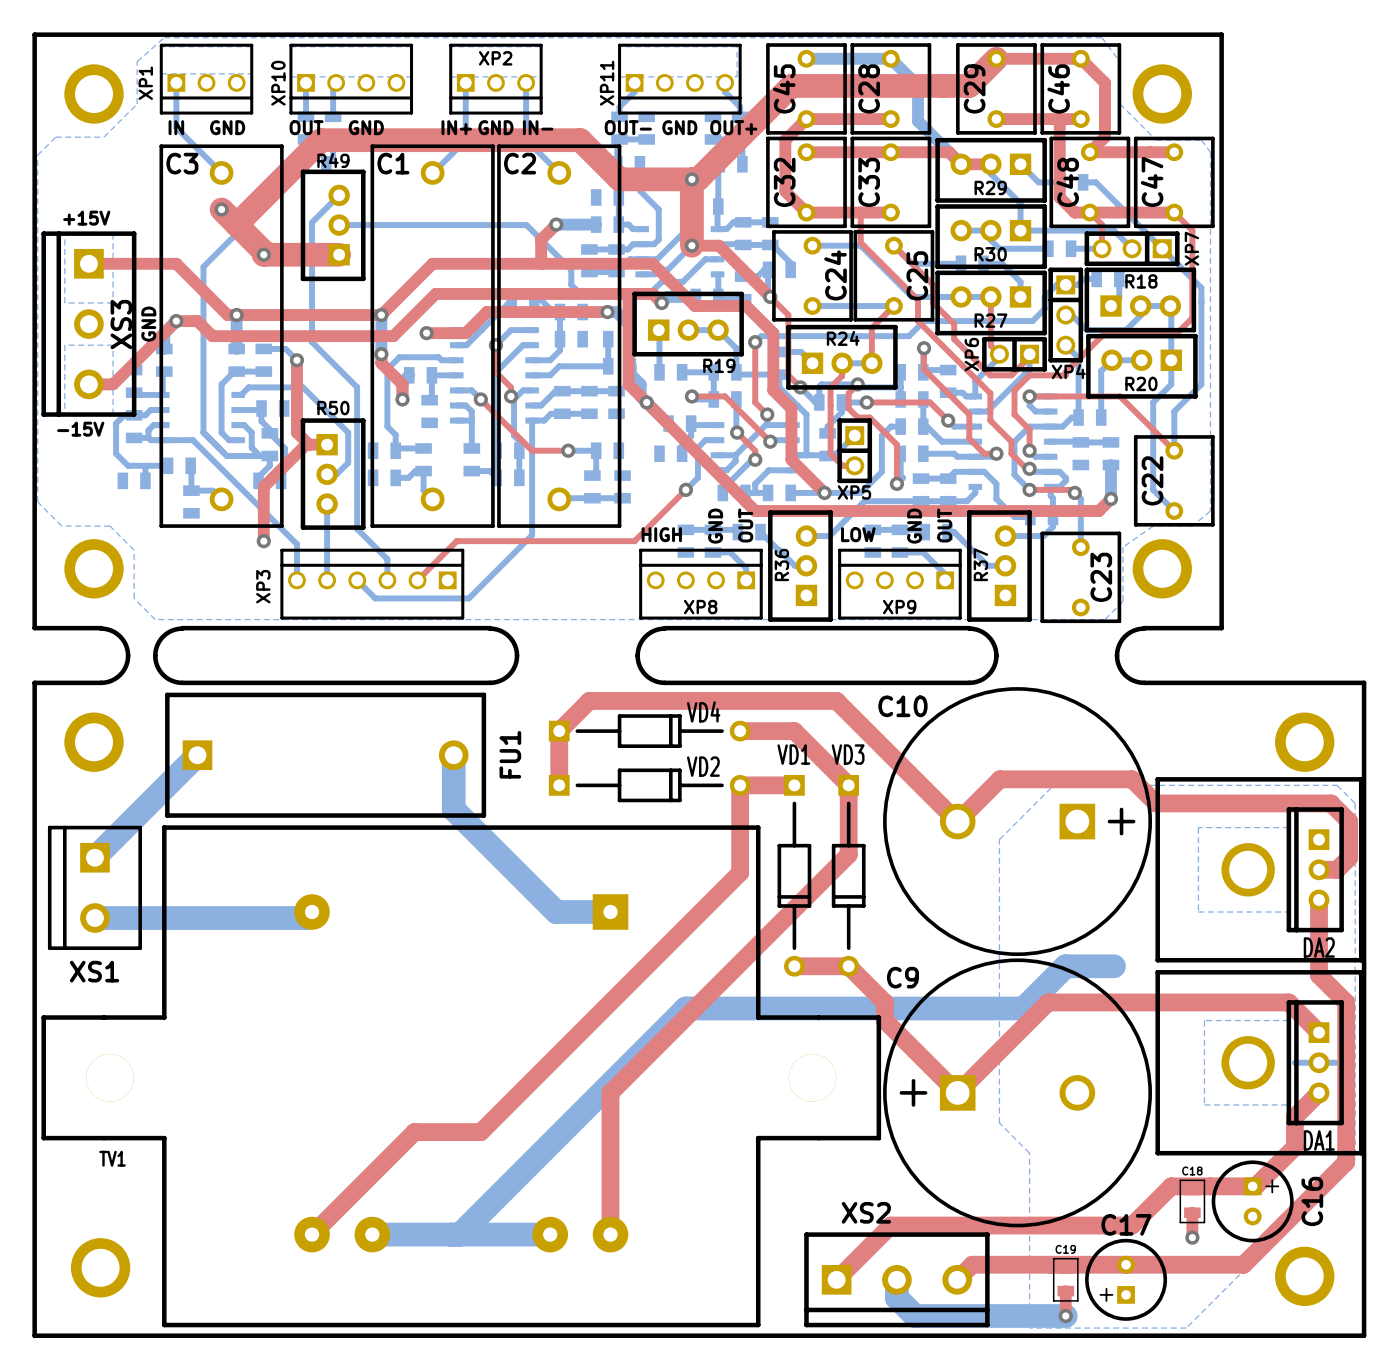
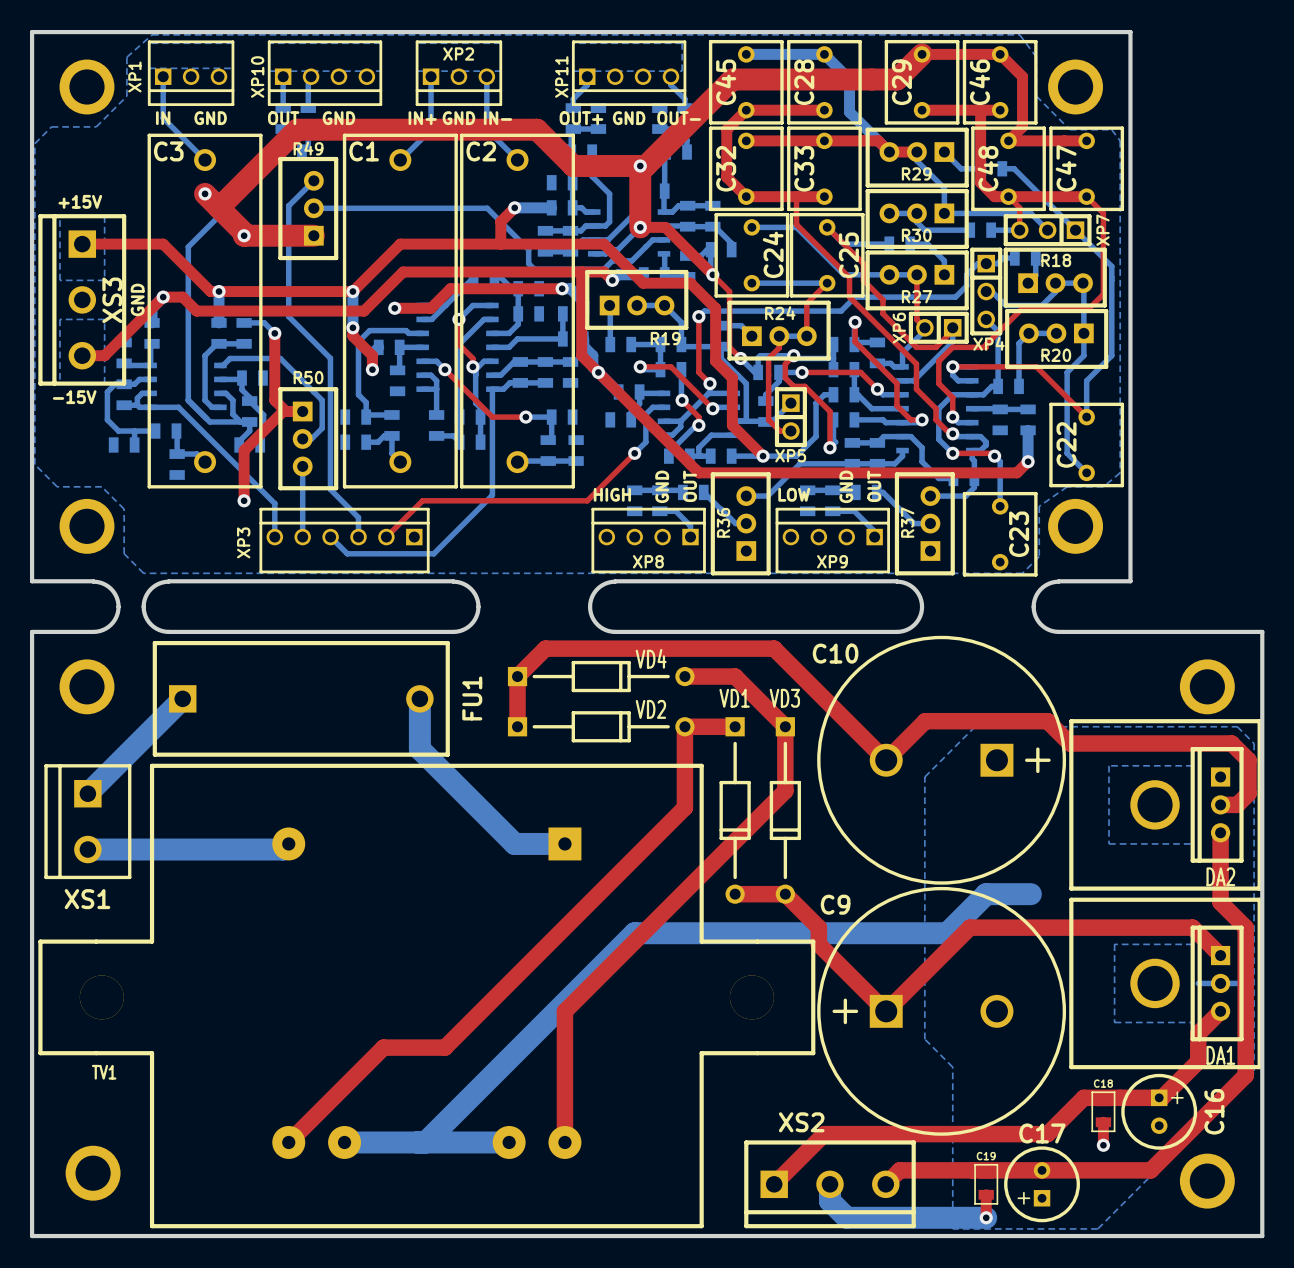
text: OUT- (628, 127) -> OUT+ (581, 118)
text: OUT+ (733, 127) -> OUT- (679, 118)

